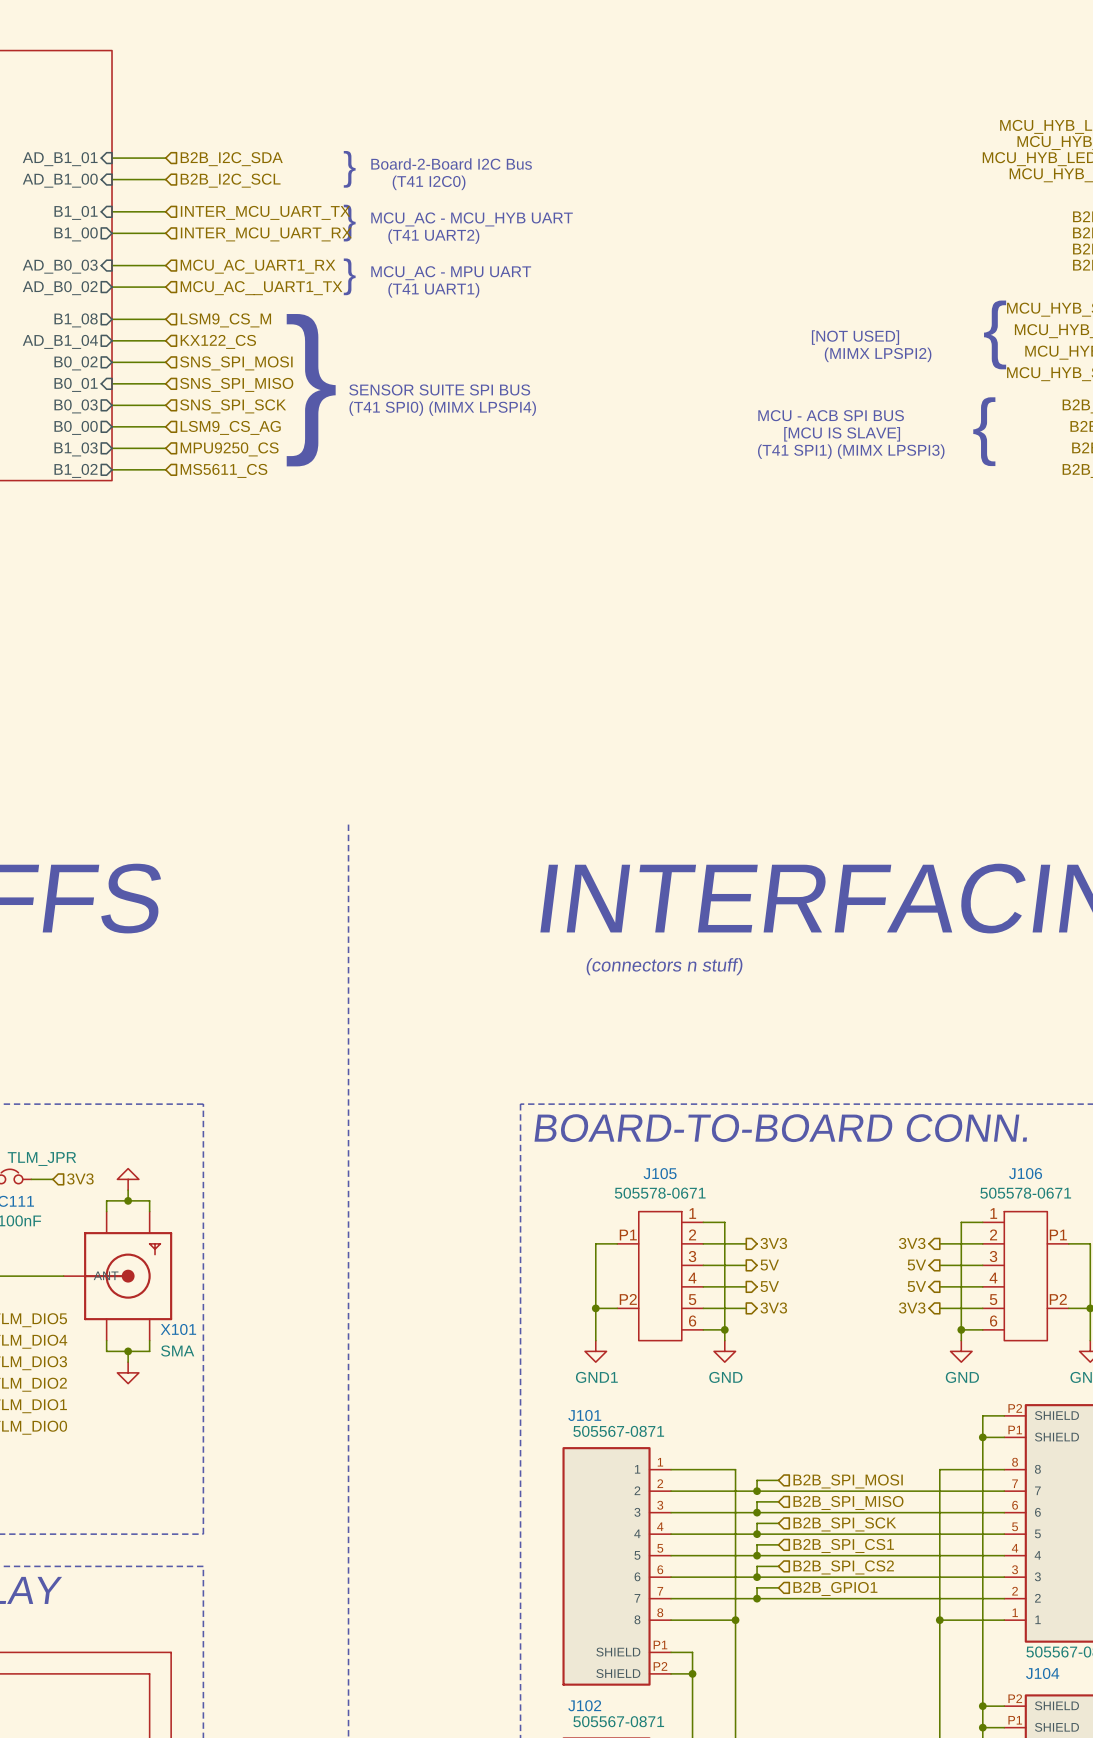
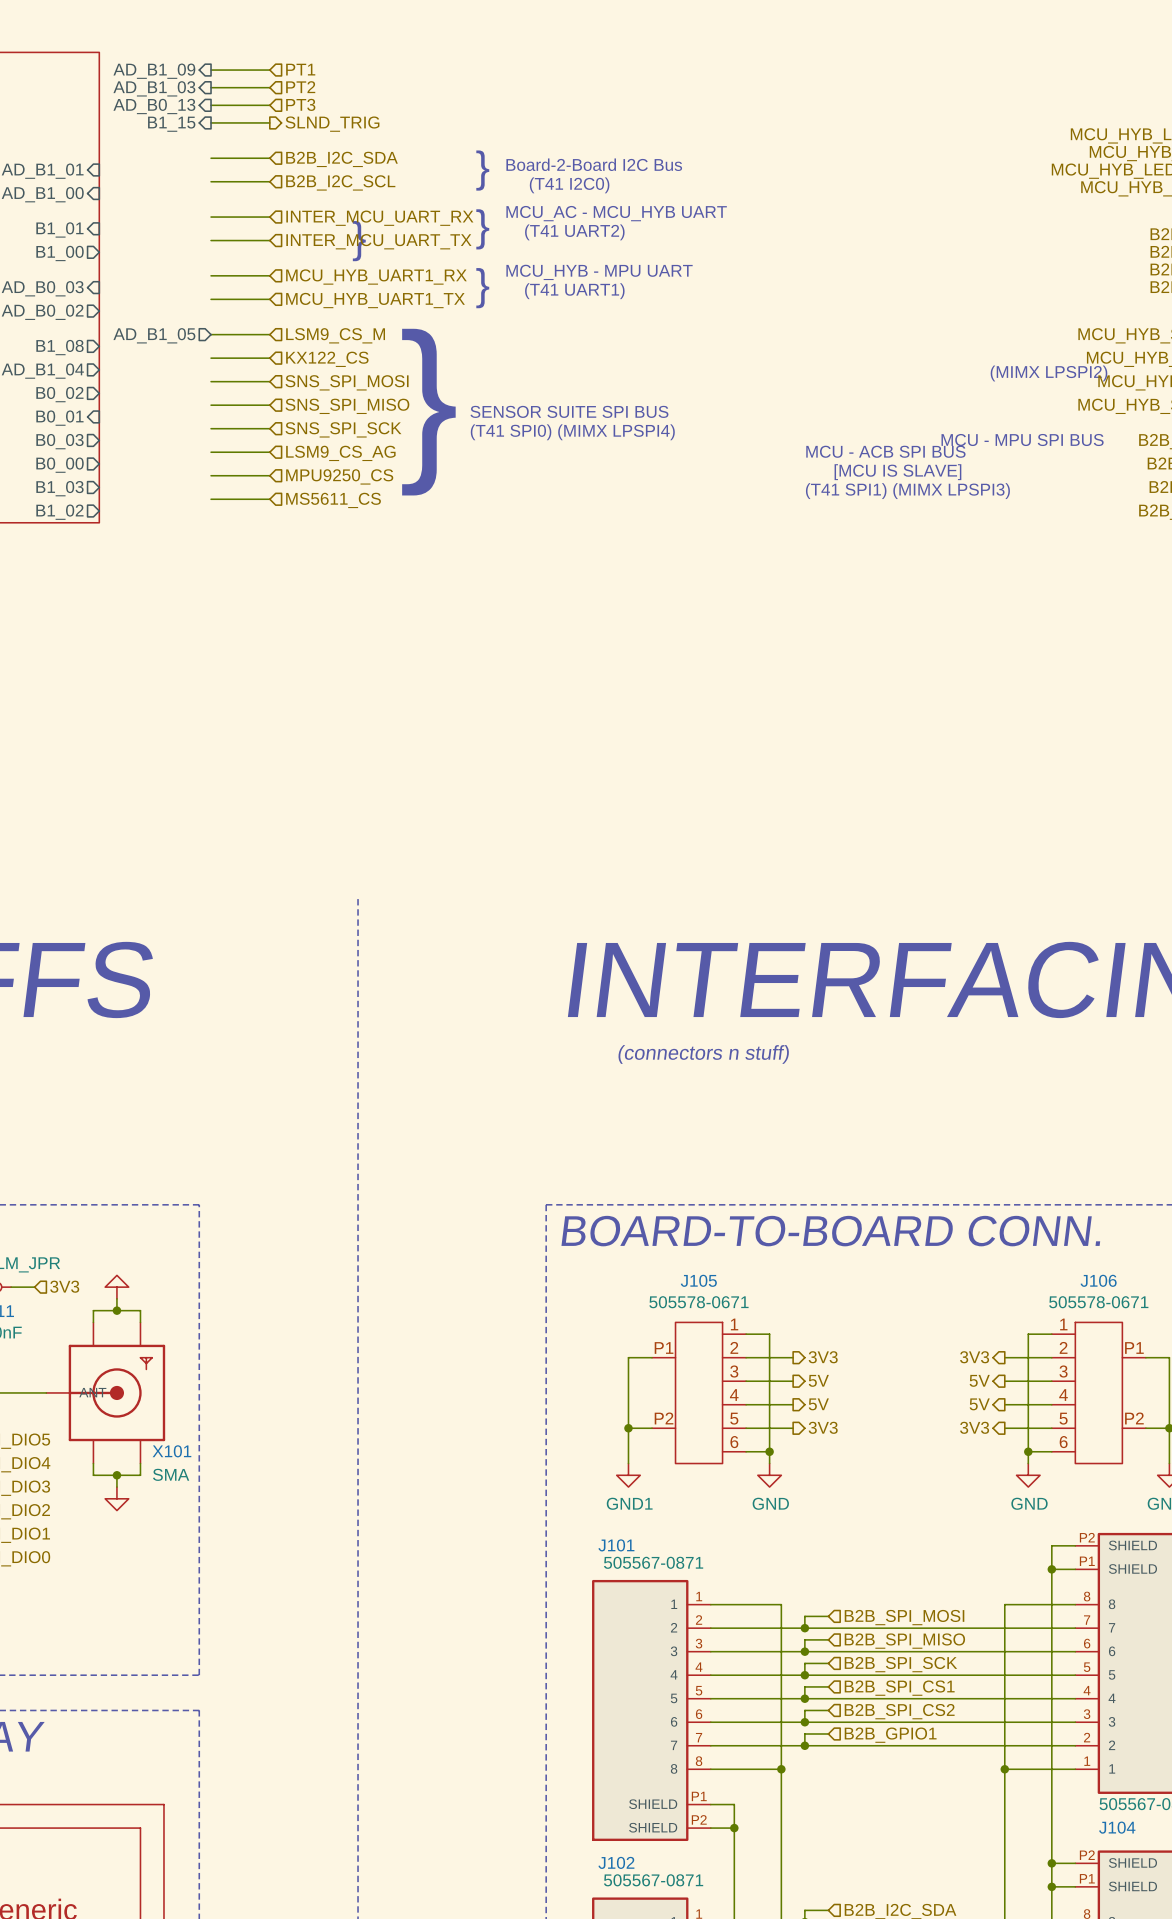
wire: none -> (211, 70) (269, 70)
hierarchical label: none -> PT1 (300, 69)
sheet pin: none -> AD_B1_09 (154, 71)
wire: none -> (211, 87) (269, 87)
hierarchical label: none -> PT2 (300, 87)
sheet pin: none -> AD_B1_03 (154, 88)
wire: none -> (211, 105) (269, 105)
hierarchical label: none -> PT3 (300, 104)
sheet pin: none -> AD_B0_13 (154, 106)
wire: none -> (211, 122) (269, 122)
sheet pin: none -> B1_15 (171, 124)
hierarchical label: none -> SLND_TRIG (332, 124)
wire: (112, 158) (165, 158) -> (211, 158) (269, 158)
text: none -> } (482, 170)
hierarchical label position: B2B_I2C_SDA (231, 159) -> B2B_I2C_SDA (341, 159)
text position: Board-2-Board I2C Bus (451, 164) -> Board-2-Board I2C Bus (594, 164)
text: } (349, 169) -> none
wire: (112, 179) (165, 179) -> (211, 181) (269, 181)
hierarchical label position: B2B_I2C_SCL (230, 180) -> B2B_I2C_SCL (340, 182)
text position: (T41 I2C0) (429, 182) -> (T41 I2C0) (569, 185)
wire: (112, 211) (165, 211) -> (211, 217) (269, 217)
hierarchical label position: INTER_MCU_UART_TX (265, 212) -> INTER_MCU_UART_TX (378, 241)
text: none -> } (482, 229)
text position: MCU_AC - MCU_HYB UART (472, 219) -> MCU_AC - MCU_HYB UART (616, 213)
wire: (112, 233) (165, 233) -> (211, 240) (269, 240)
hierarchical label position: INTER_MCU_UART_RX (266, 234) -> INTER_MCU_UART_RX (379, 218)
text position: (T41 UART2) (433, 236) -> (T41 UART2) (574, 232)
hierarchical label: none -> MCU_HYB_UART1_RX (376, 277)
wire: (112, 265) (165, 265) -> (211, 275) (269, 275)
hierarchical label: MCU_AC_UART1_RX (258, 266) -> none
text: none -> } (482, 288)
text: MCU_AC - MPU UART (451, 273) -> MCU_HYB - MPU UART (599, 272)
text: } (349, 276) -> none
hierarchical label: none -> MCU_HYB_UART1_TX (375, 300)
wire: (112, 287) (165, 287) -> (211, 299) (269, 299)
hierarchical label: MCU_AC__UART1_TX (261, 288) -> none
text position: (T41 UART1) (433, 290) -> (T41 UART1) (574, 291)
sheet pin: none -> AD_B1_05 (154, 335)
wire: (112, 319) (165, 319) -> (211, 334) (269, 334)
hierarchical label position: LSM9_CS_M (225, 320) -> LSM9_CS_M (335, 335)
text: { (995, 334) -> none
text: [NOT USED] (855, 337) -> none
wire: (112, 340) (165, 340) -> (211, 358) (269, 358)
hierarchical label position: KX122_CS (218, 341) -> KX122_CS (327, 359)
text position: (MIMX LPSPI2) (878, 354) -> (MIMX LPSPI2) (1048, 373)
wire: (112, 362) (165, 362) -> (211, 381) (269, 381)
hierarchical label position: SNS_SPI_MOSI (236, 363) -> SNS_SPI_MOSI (347, 382)
wire: (112, 383) (165, 383) -> (211, 405) (269, 405)
hierarchical label position: SNS_SPI_MISO (236, 384) -> SNS_SPI_MISO (347, 406)
text position: SENSOR SUITE SPI BUS (439, 389) -> SENSOR SUITE SPI BUS (569, 411)
text position: } (311, 390) -> } (428, 412)
text: none -> MCU - MPU SPI BUS (1022, 439)
wire: (112, 405) (165, 405) -> (211, 428) (269, 428)
hierarchical label position: SNS_SPI_SCK (233, 406) -> SNS_SPI_SCK (343, 429)
text position: (T41 SPI0) (MIMX LPSPI4) (442, 408) -> (T41 SPI0) (MIMX LPSPI4) (572, 432)
wire: (112, 426) (165, 426) -> (211, 452) (269, 452)
hierarchical label position: LSM9_CS_AG (230, 427) -> LSM9_CS_AG (340, 453)
text: { (984, 431) -> none
wire: (112, 448) (165, 448) -> (211, 475) (269, 475)
hierarchical label position: MPU9250_CS (229, 449) -> MPU9250_CS (339, 476)
wire: (112, 469) (165, 469) -> (211, 499) (269, 499)
hierarchical label position: MS5611_CS (223, 470) -> MS5611_CS (333, 500)

